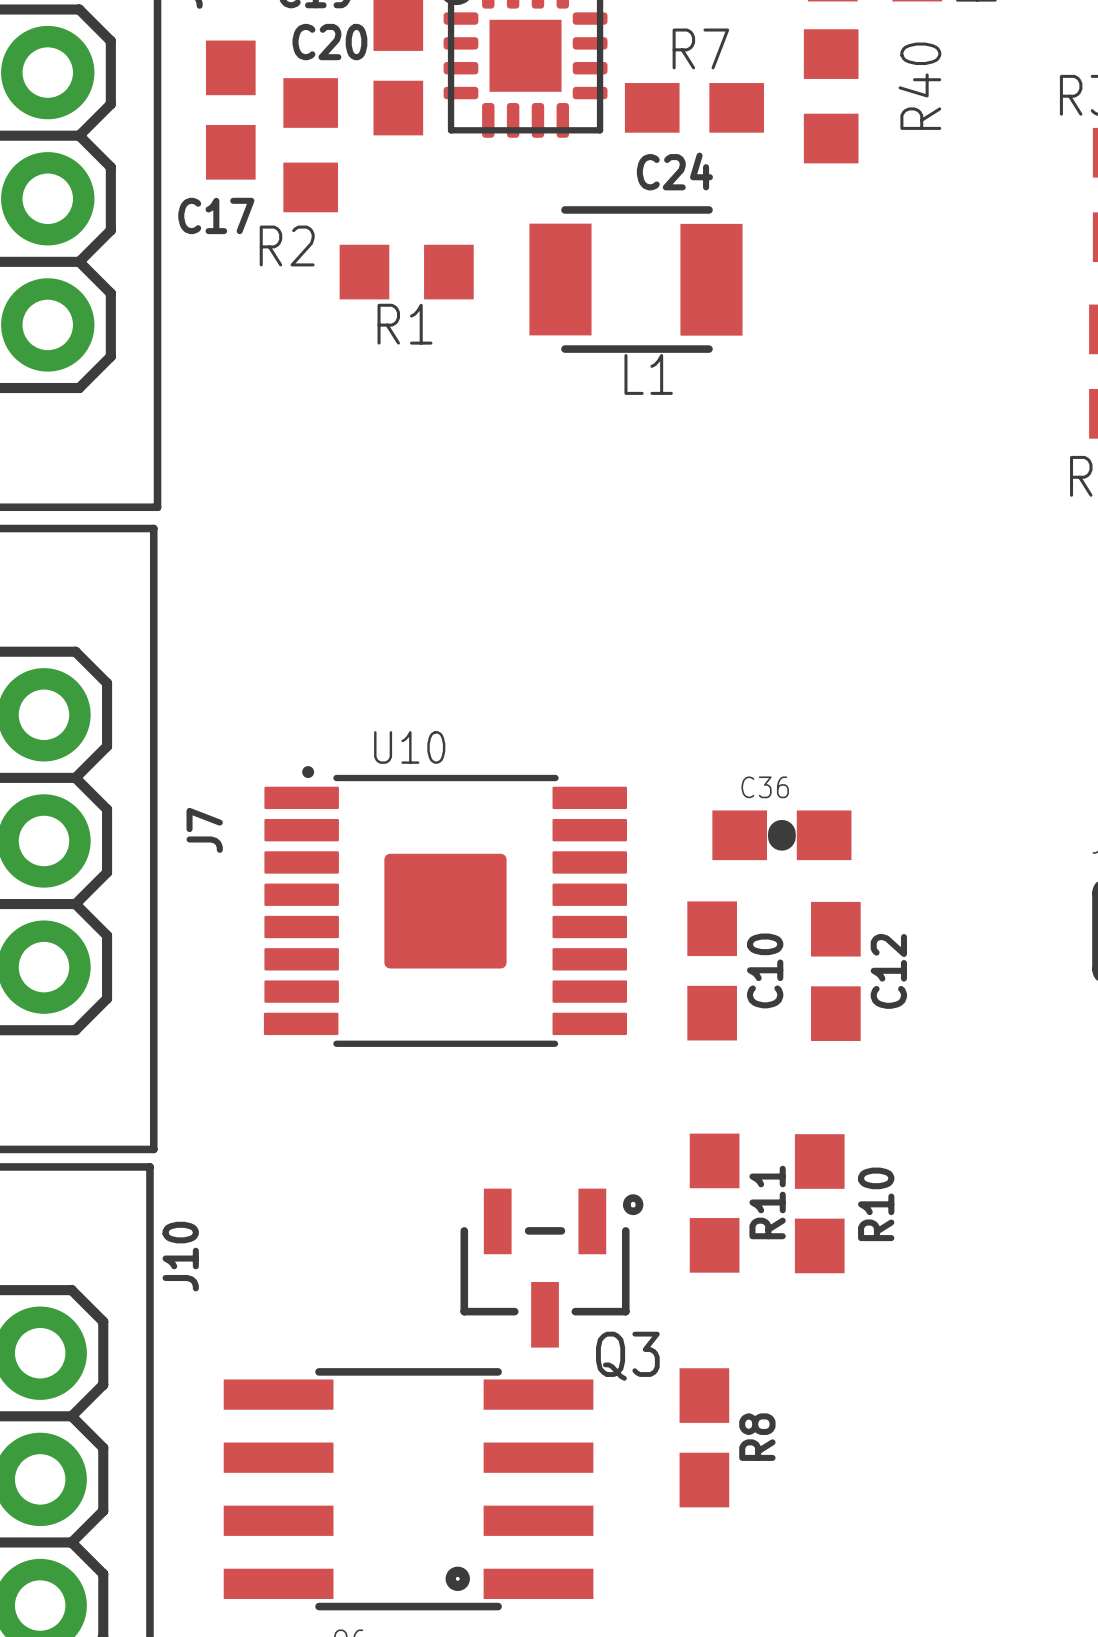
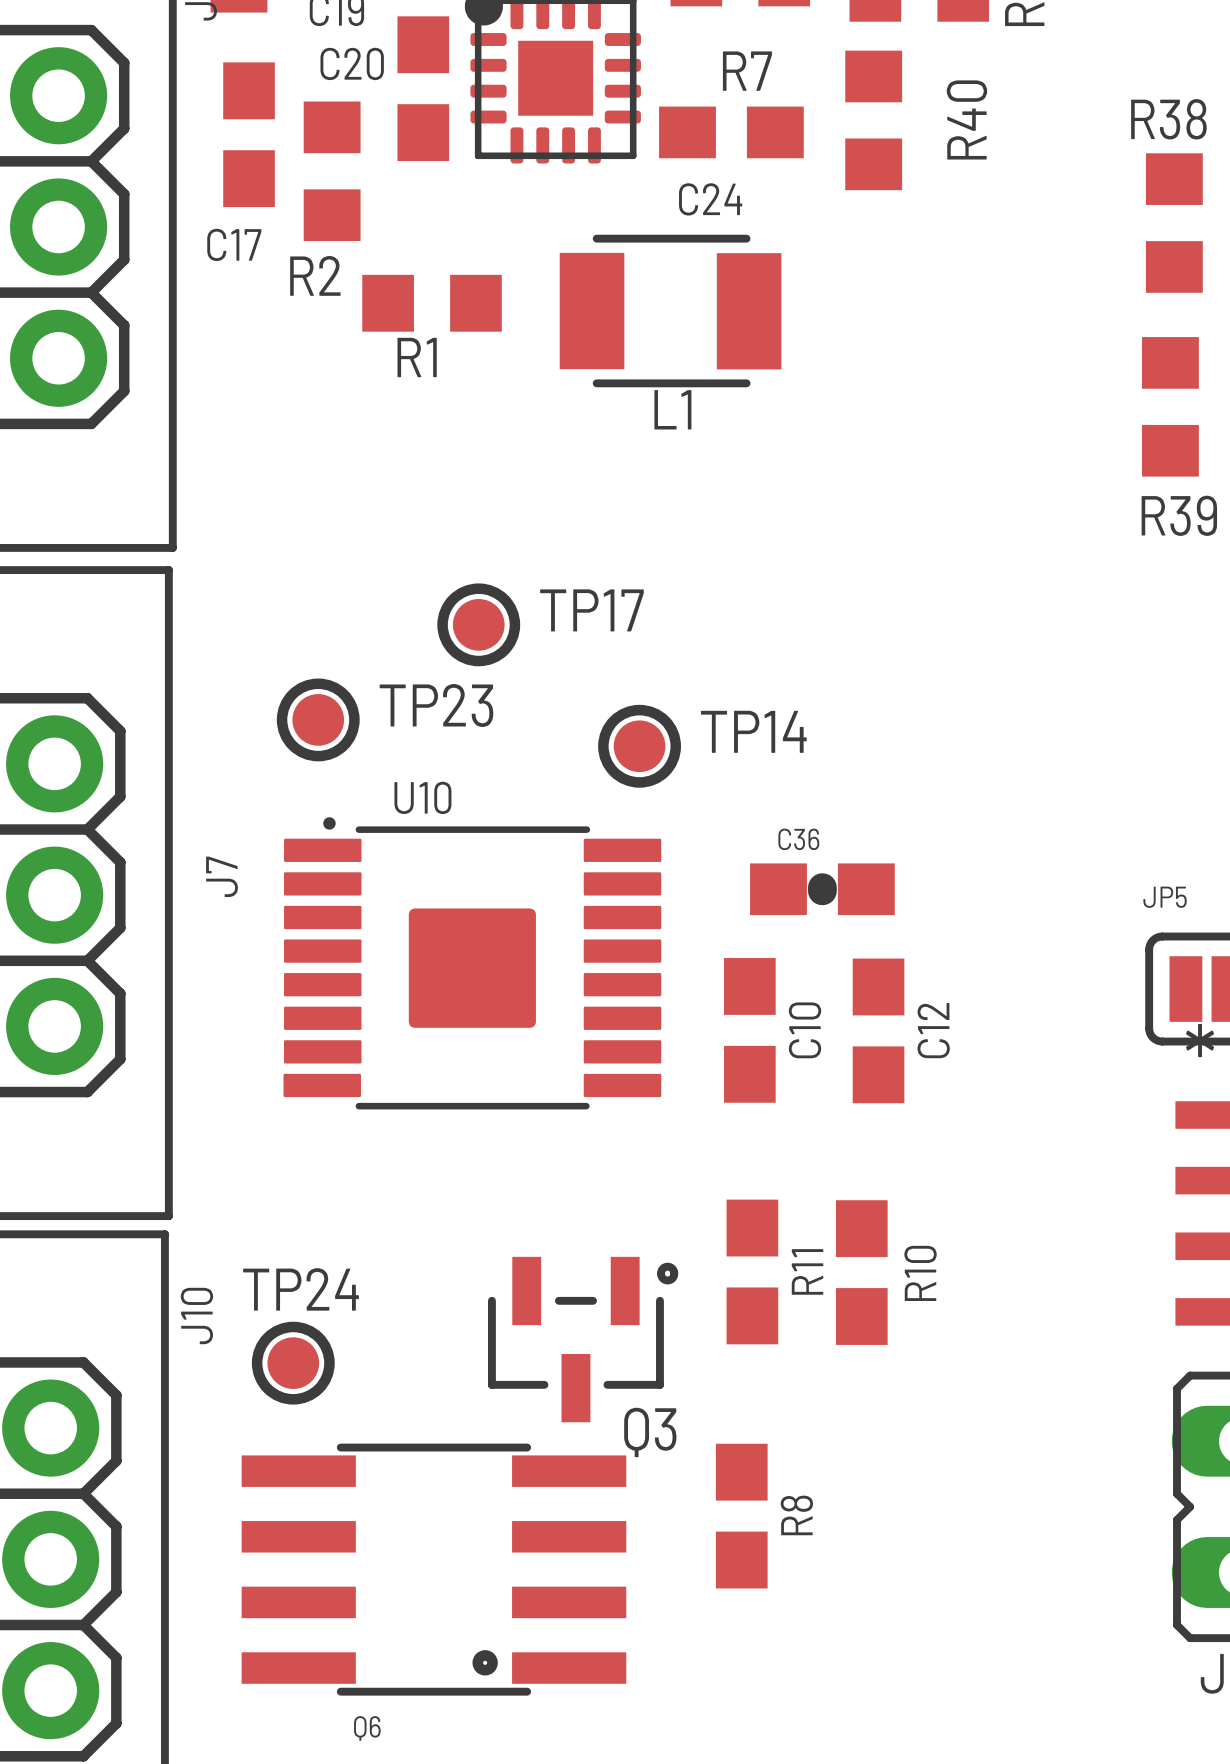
TP17: none -> (478, 624)
TP23: none -> (318, 719)
TP14: none -> (639, 746)
TP24: none -> (293, 1363)

